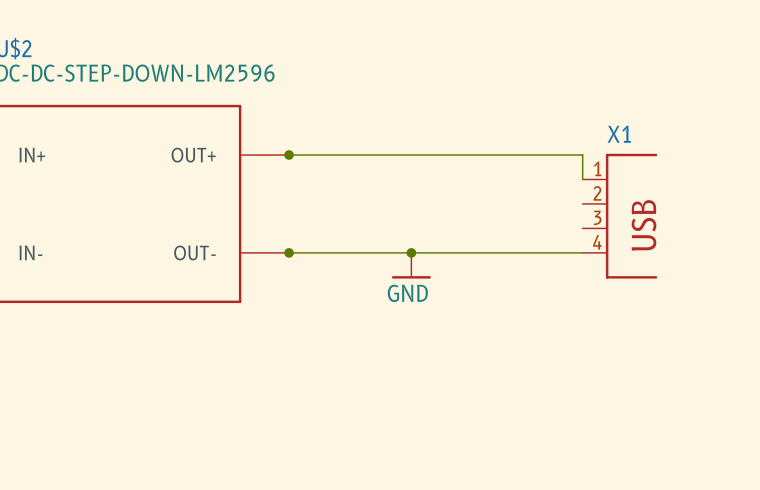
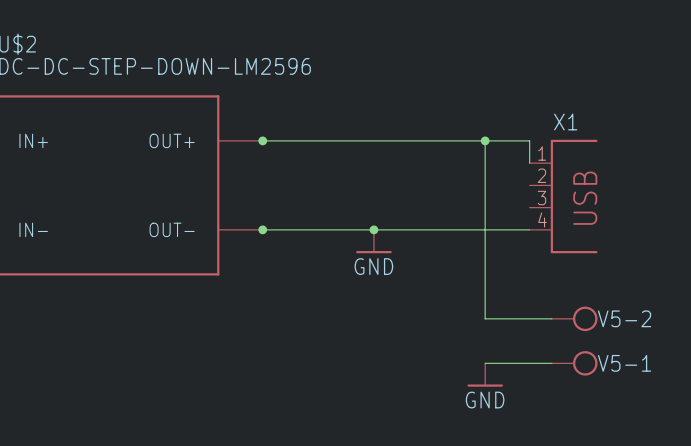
wire: none -> (485, 140) (485, 318) (551, 318)
junction: none -> (485, 140)
V5-2: none -> (574, 318)
wire: none -> (485, 363) (551, 363)
V5-1: none -> (574, 363)
power symbol: none -> GND (485, 375)

